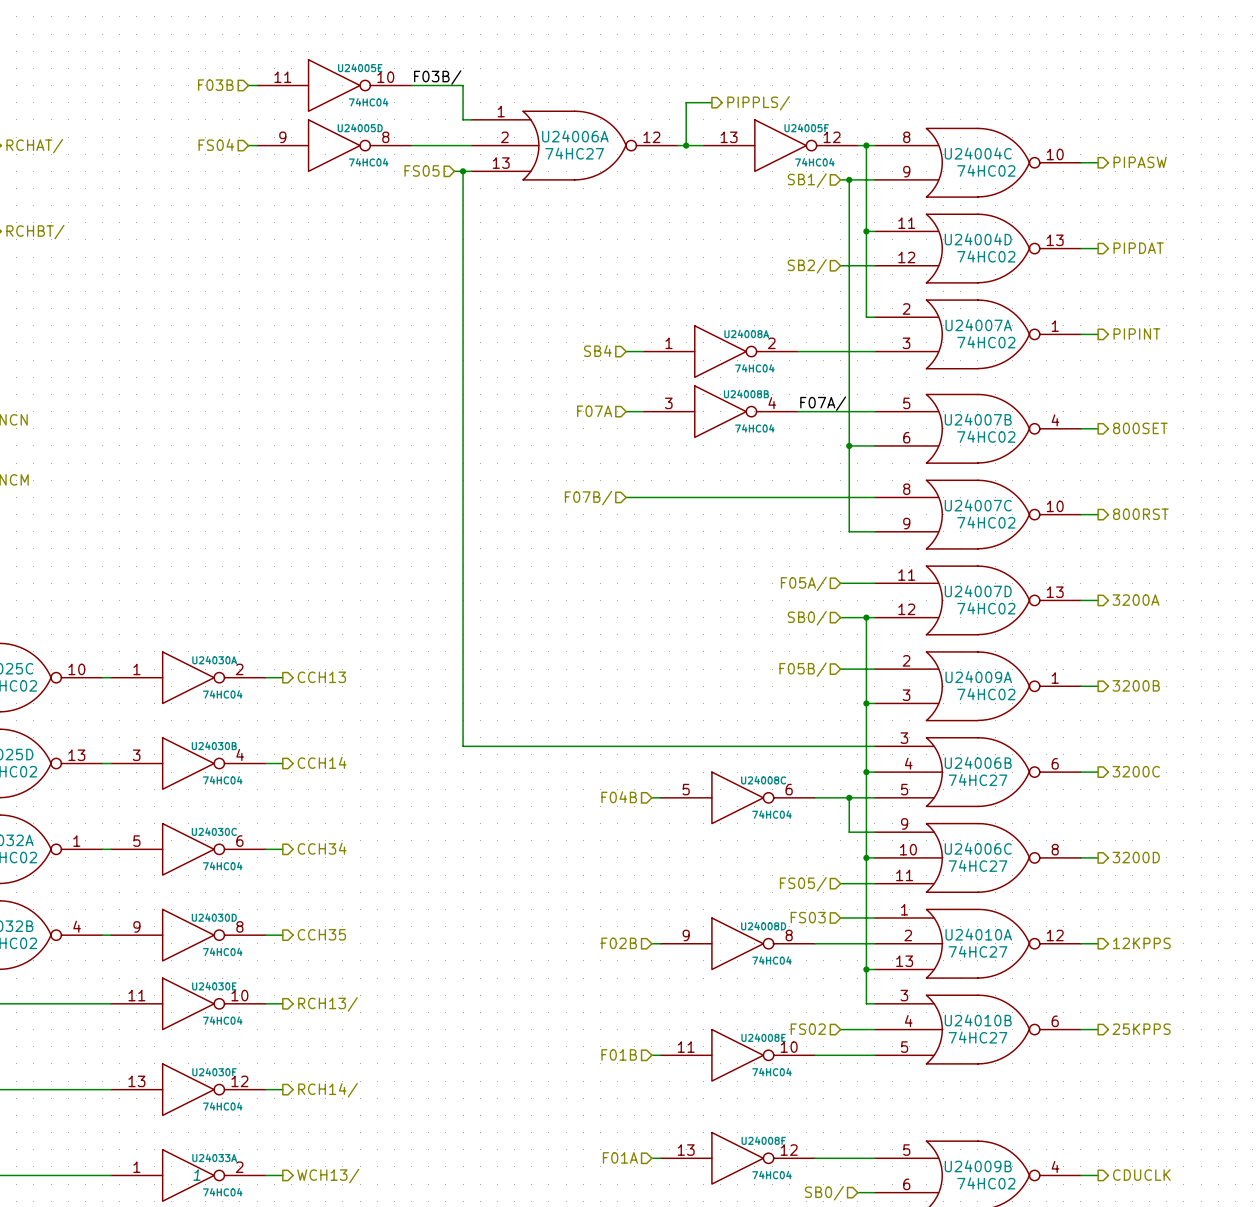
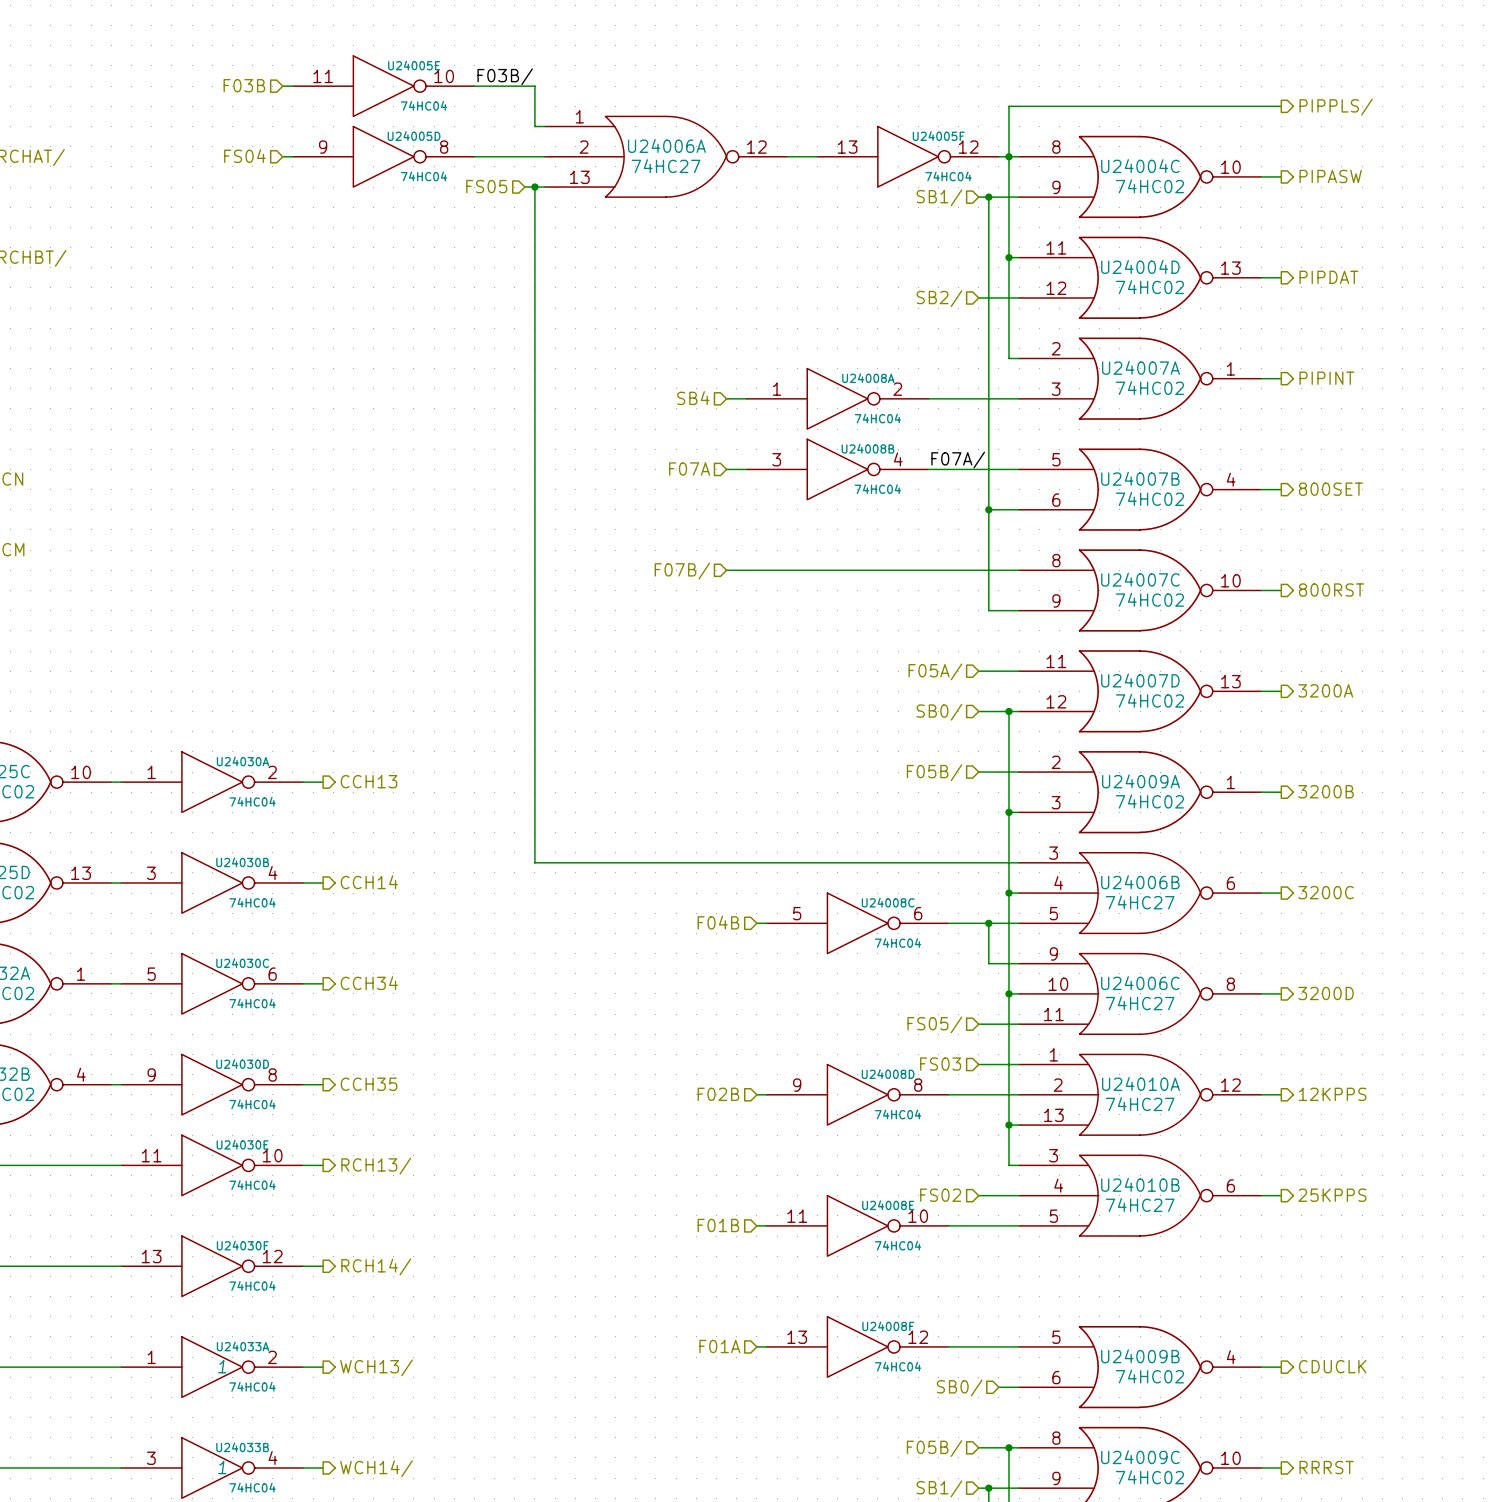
wire: (711, 102) (686, 102) (686, 145) -> none
wire: none -> (1281, 106) (1008, 106) (1008, 156)
hierarchical label: PIPPLS/ (758, 103) -> none
hierarchical label: none -> PIPPLS/ (1336, 107)
junction: (686, 145) -> none

